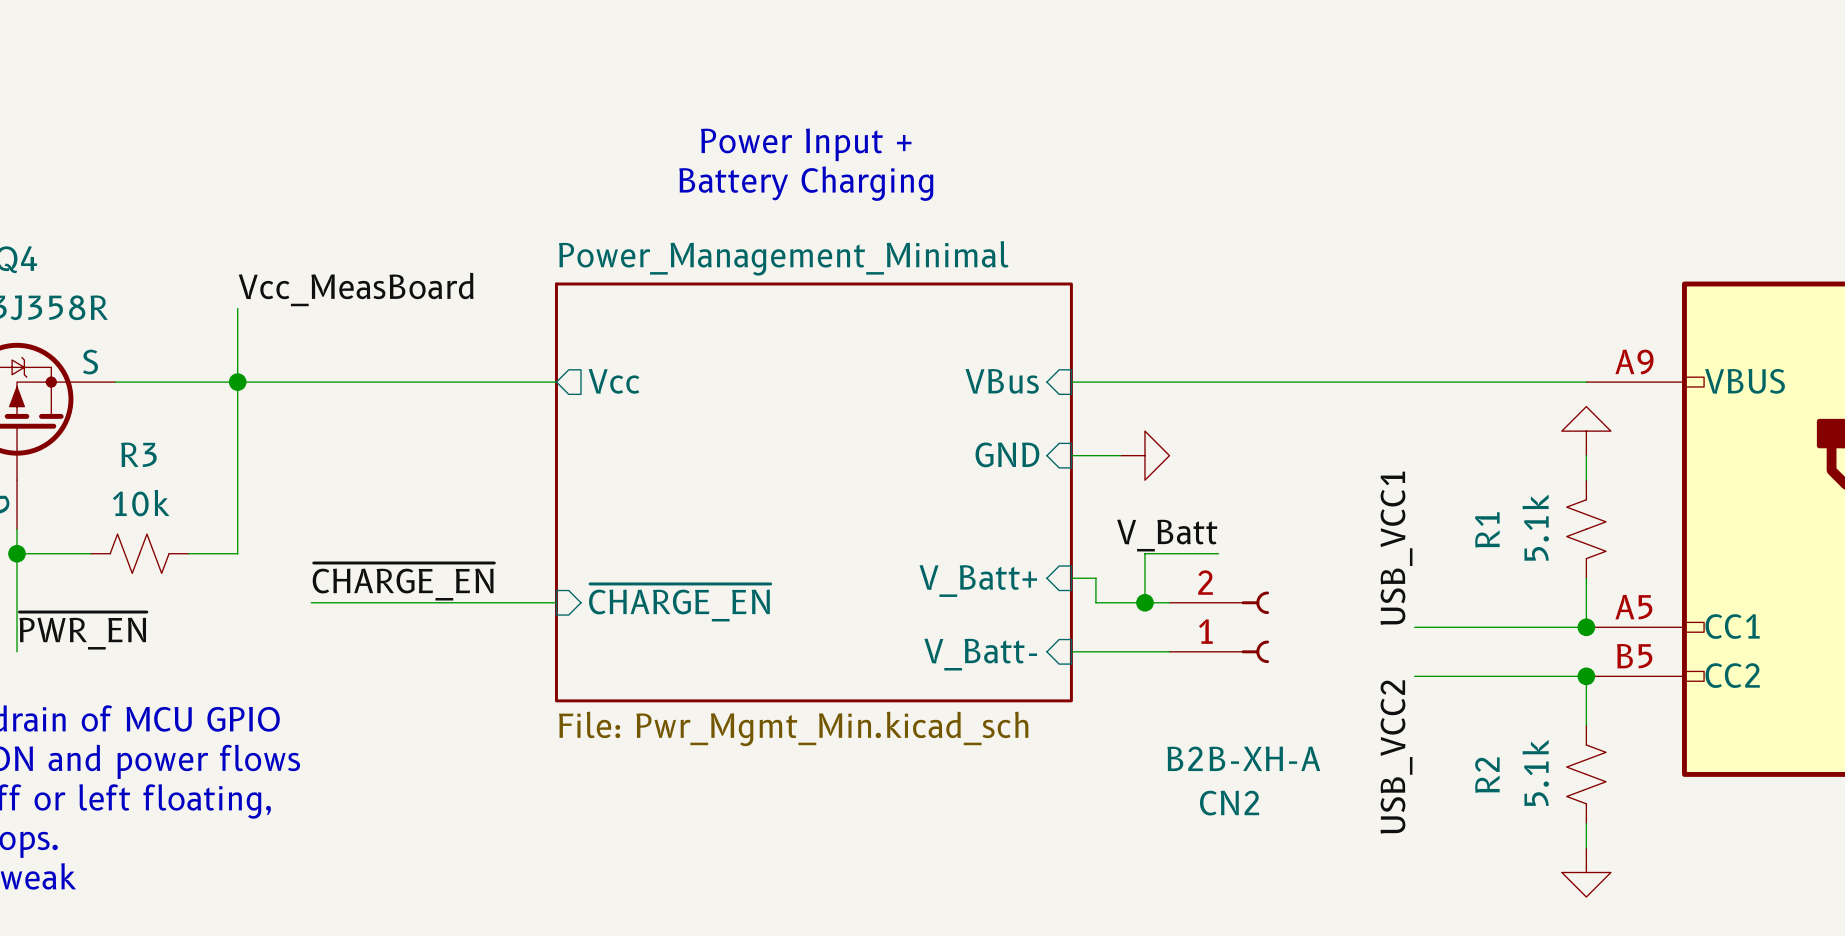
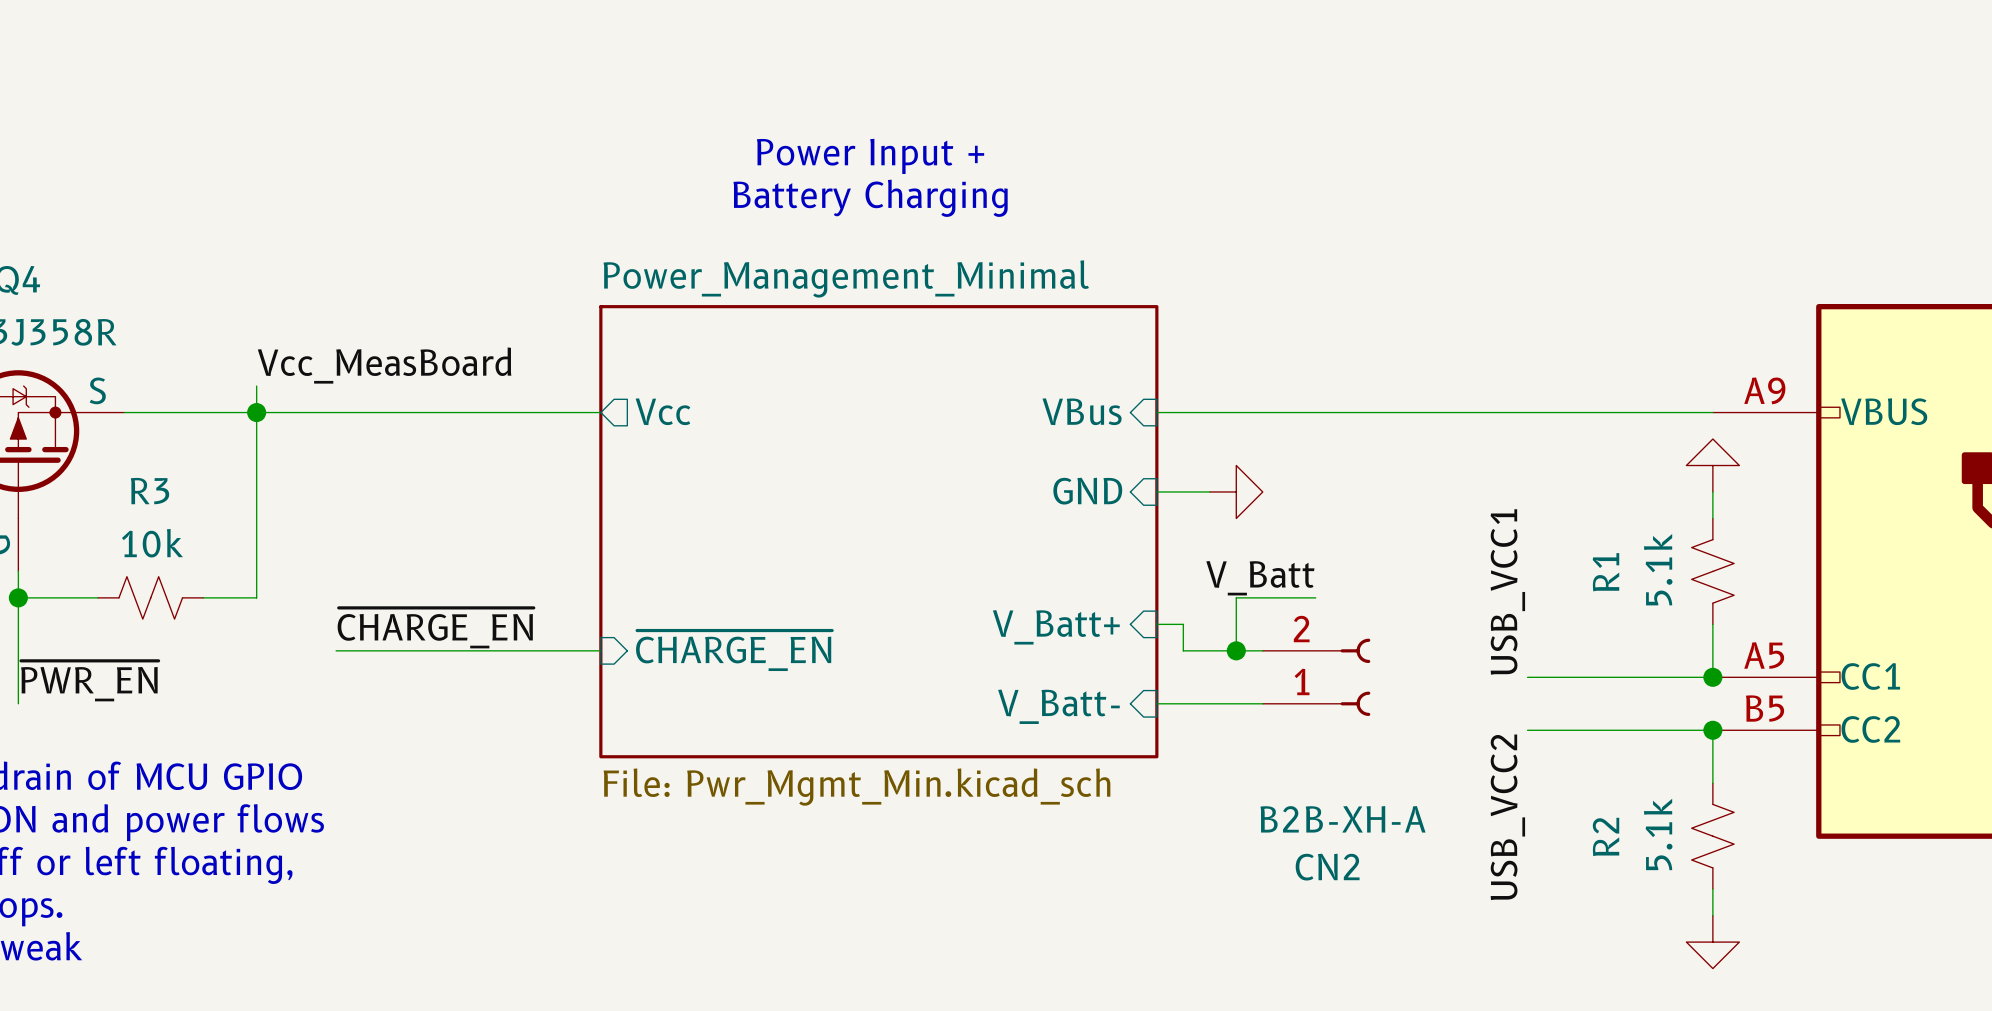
label position: Vcc_MeasBoard (356, 289) -> Vcc_MeasBoard (384, 365)
wire: (237, 308) (237, 357) -> none

